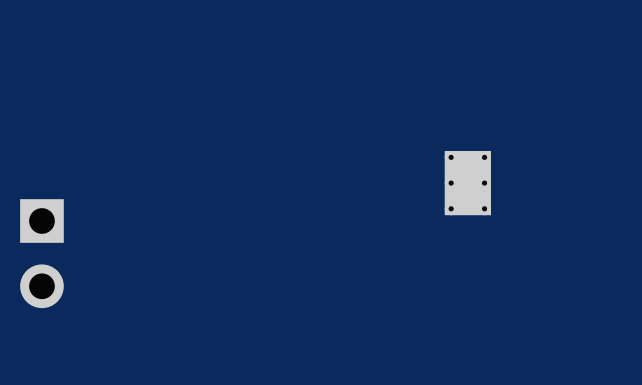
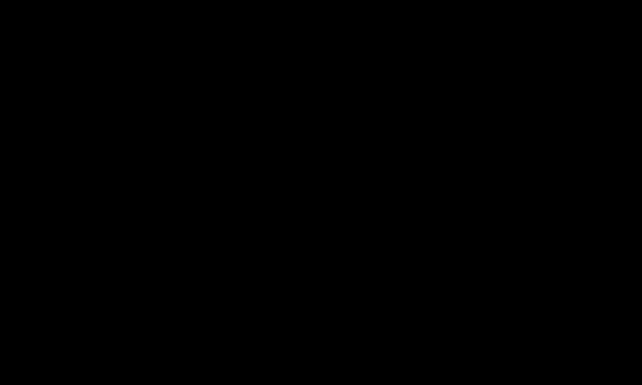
part: (467, 183) -> none
part: (41, 253) -> none

